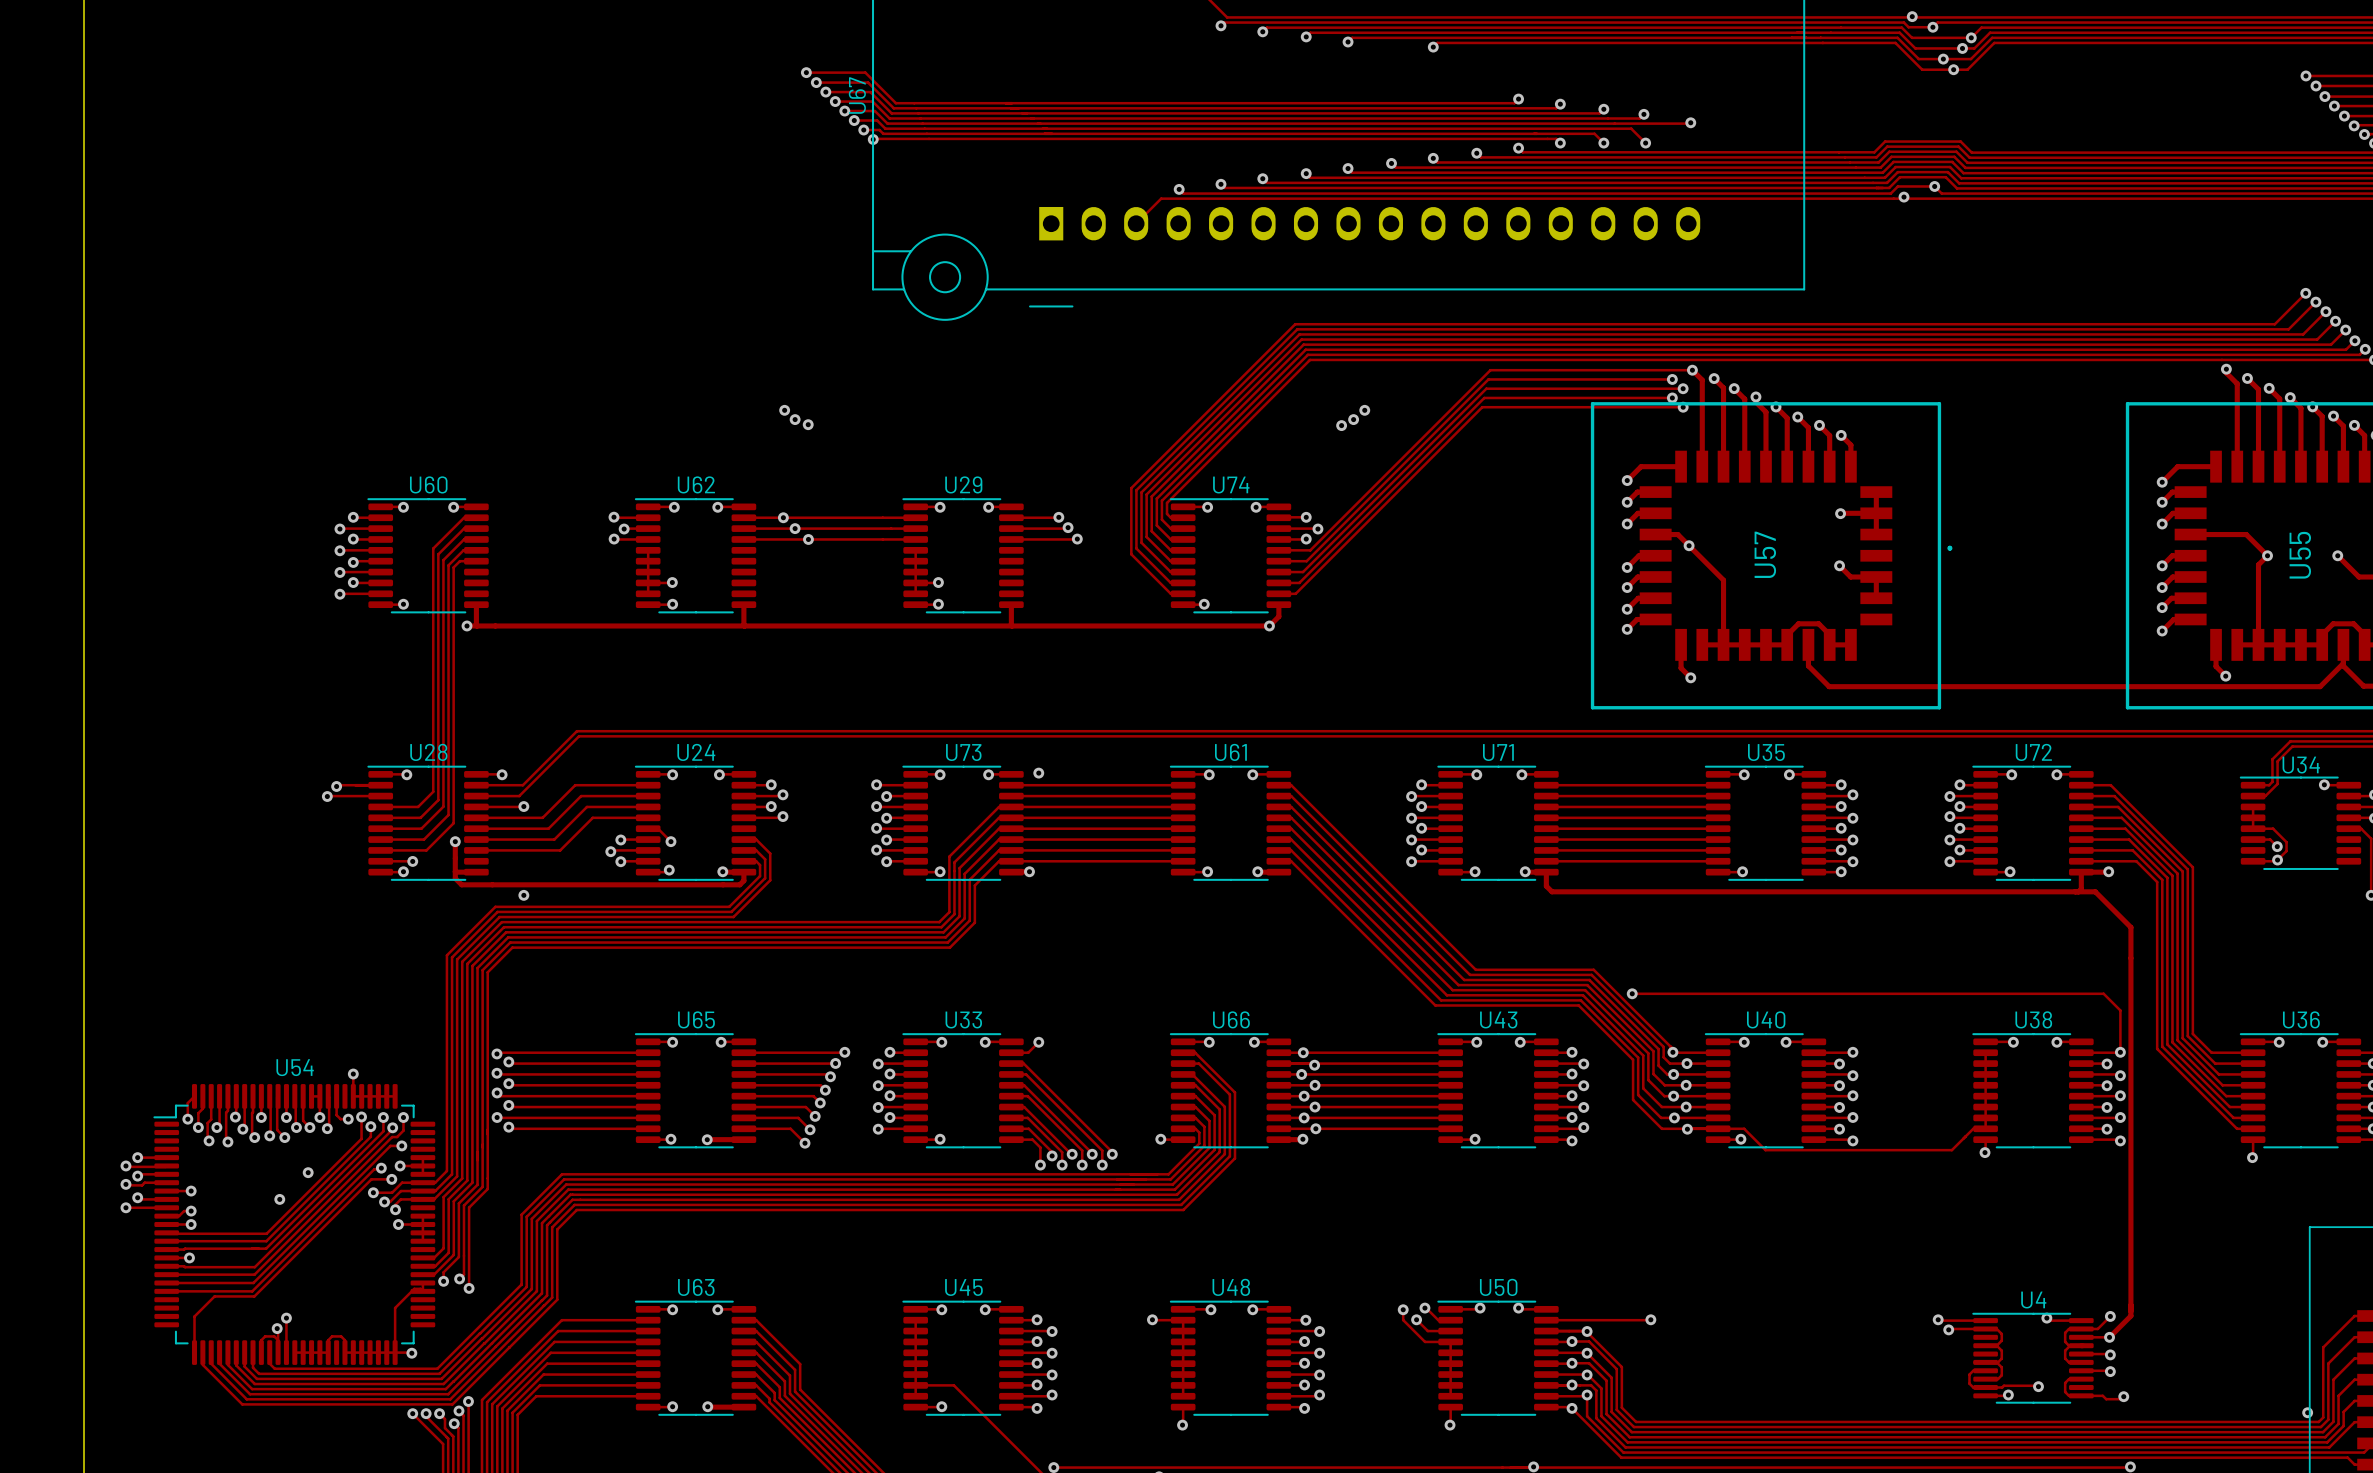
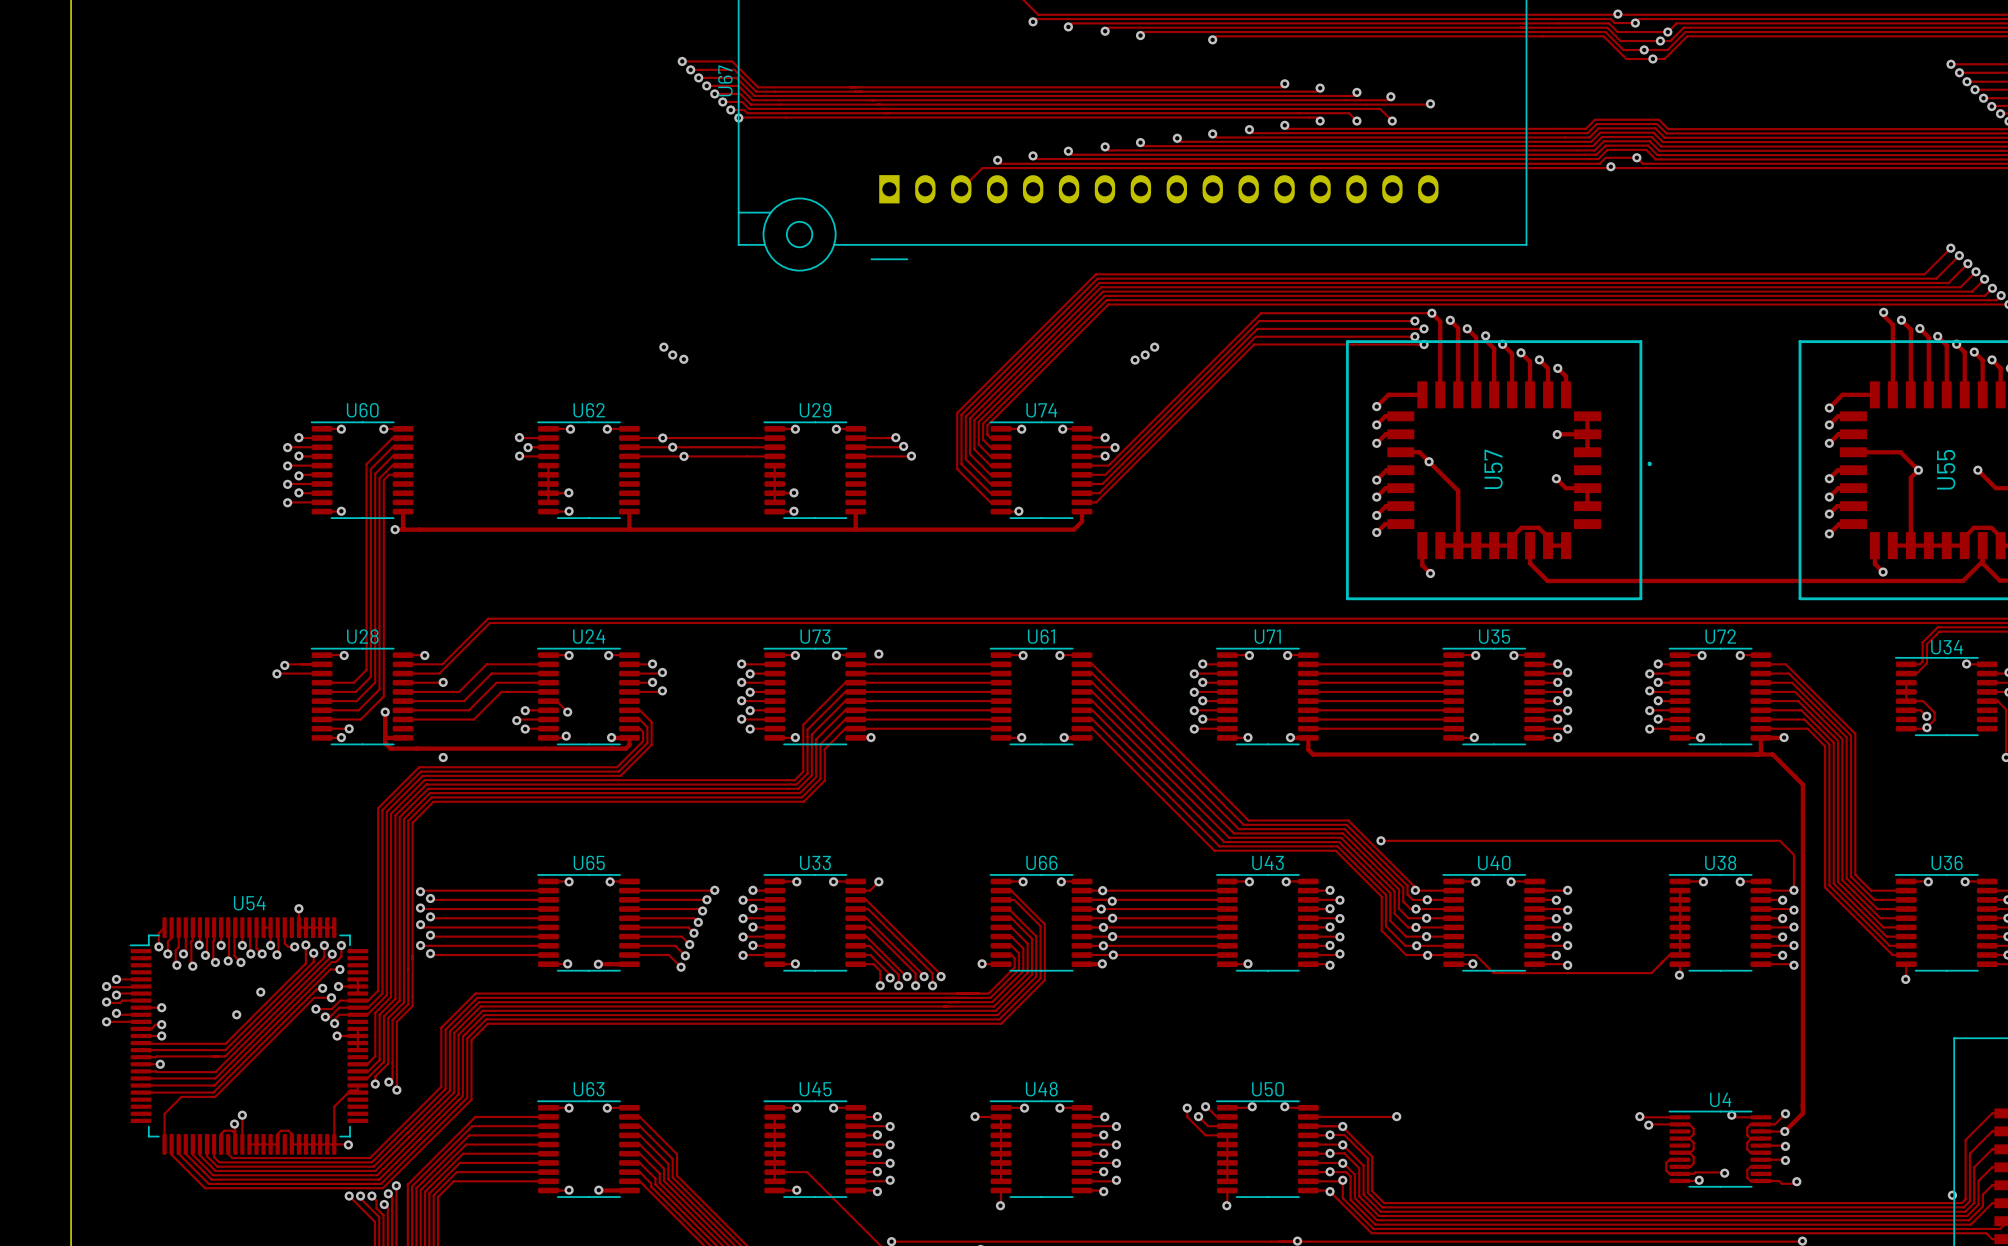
via: (1269, 625) -> none

